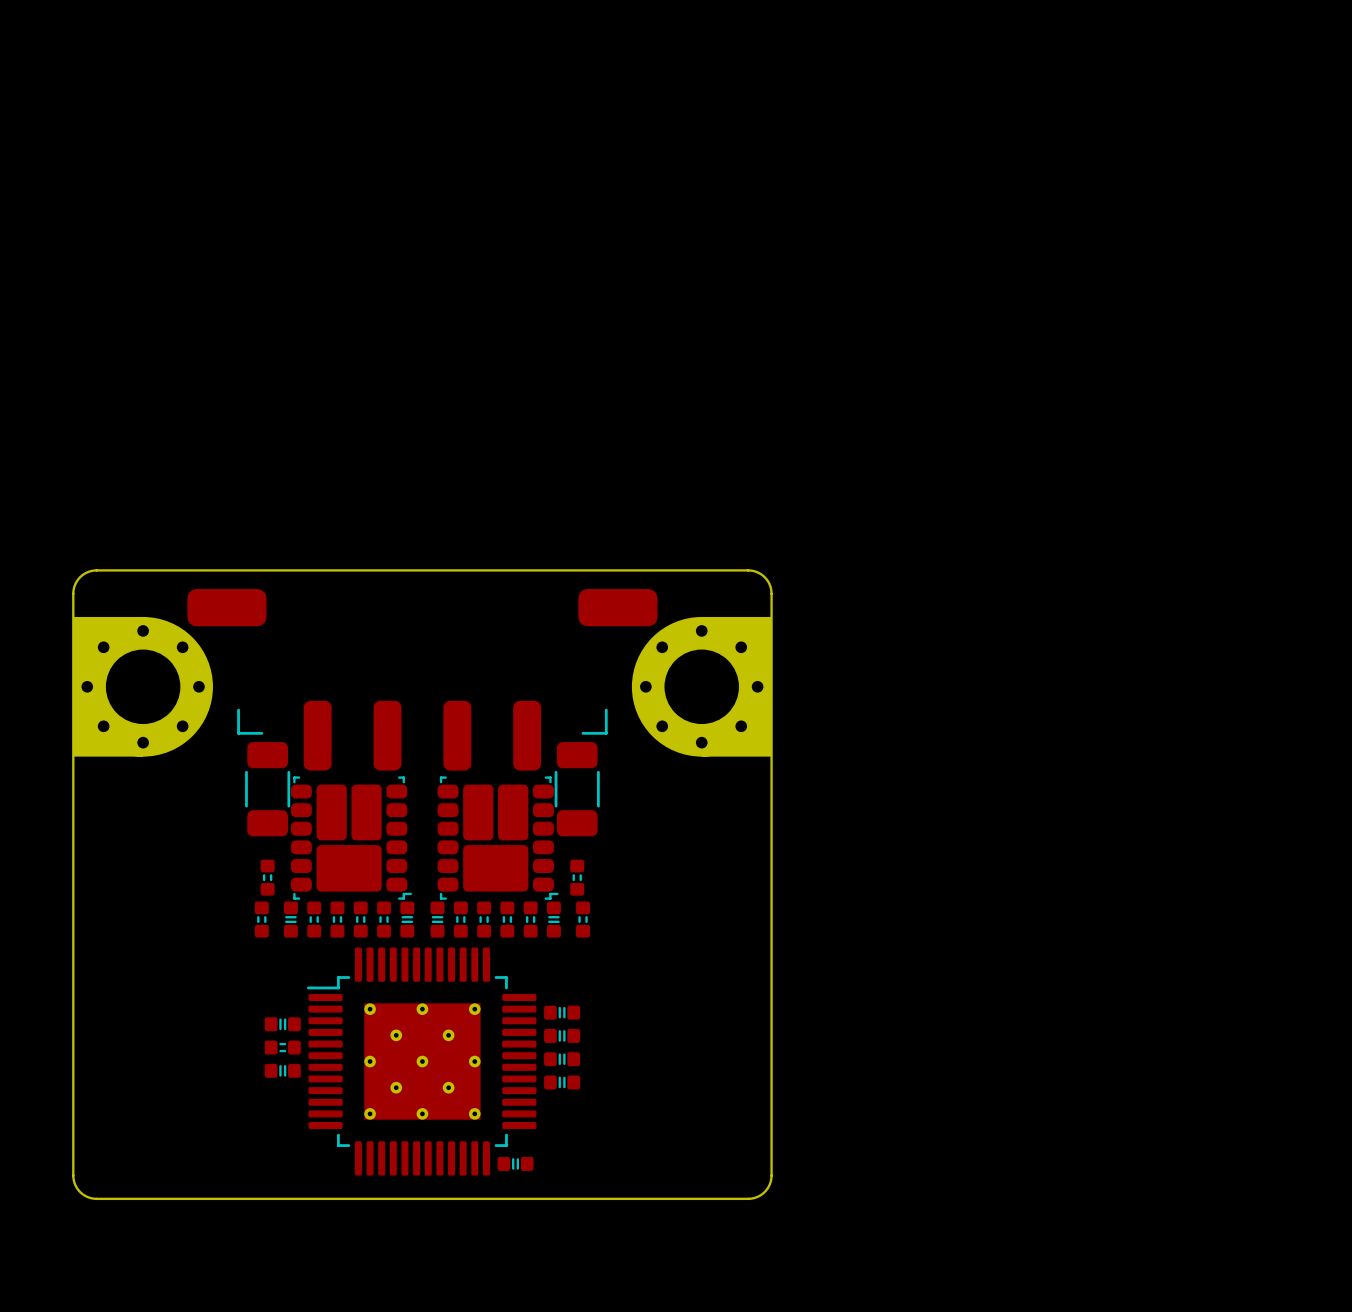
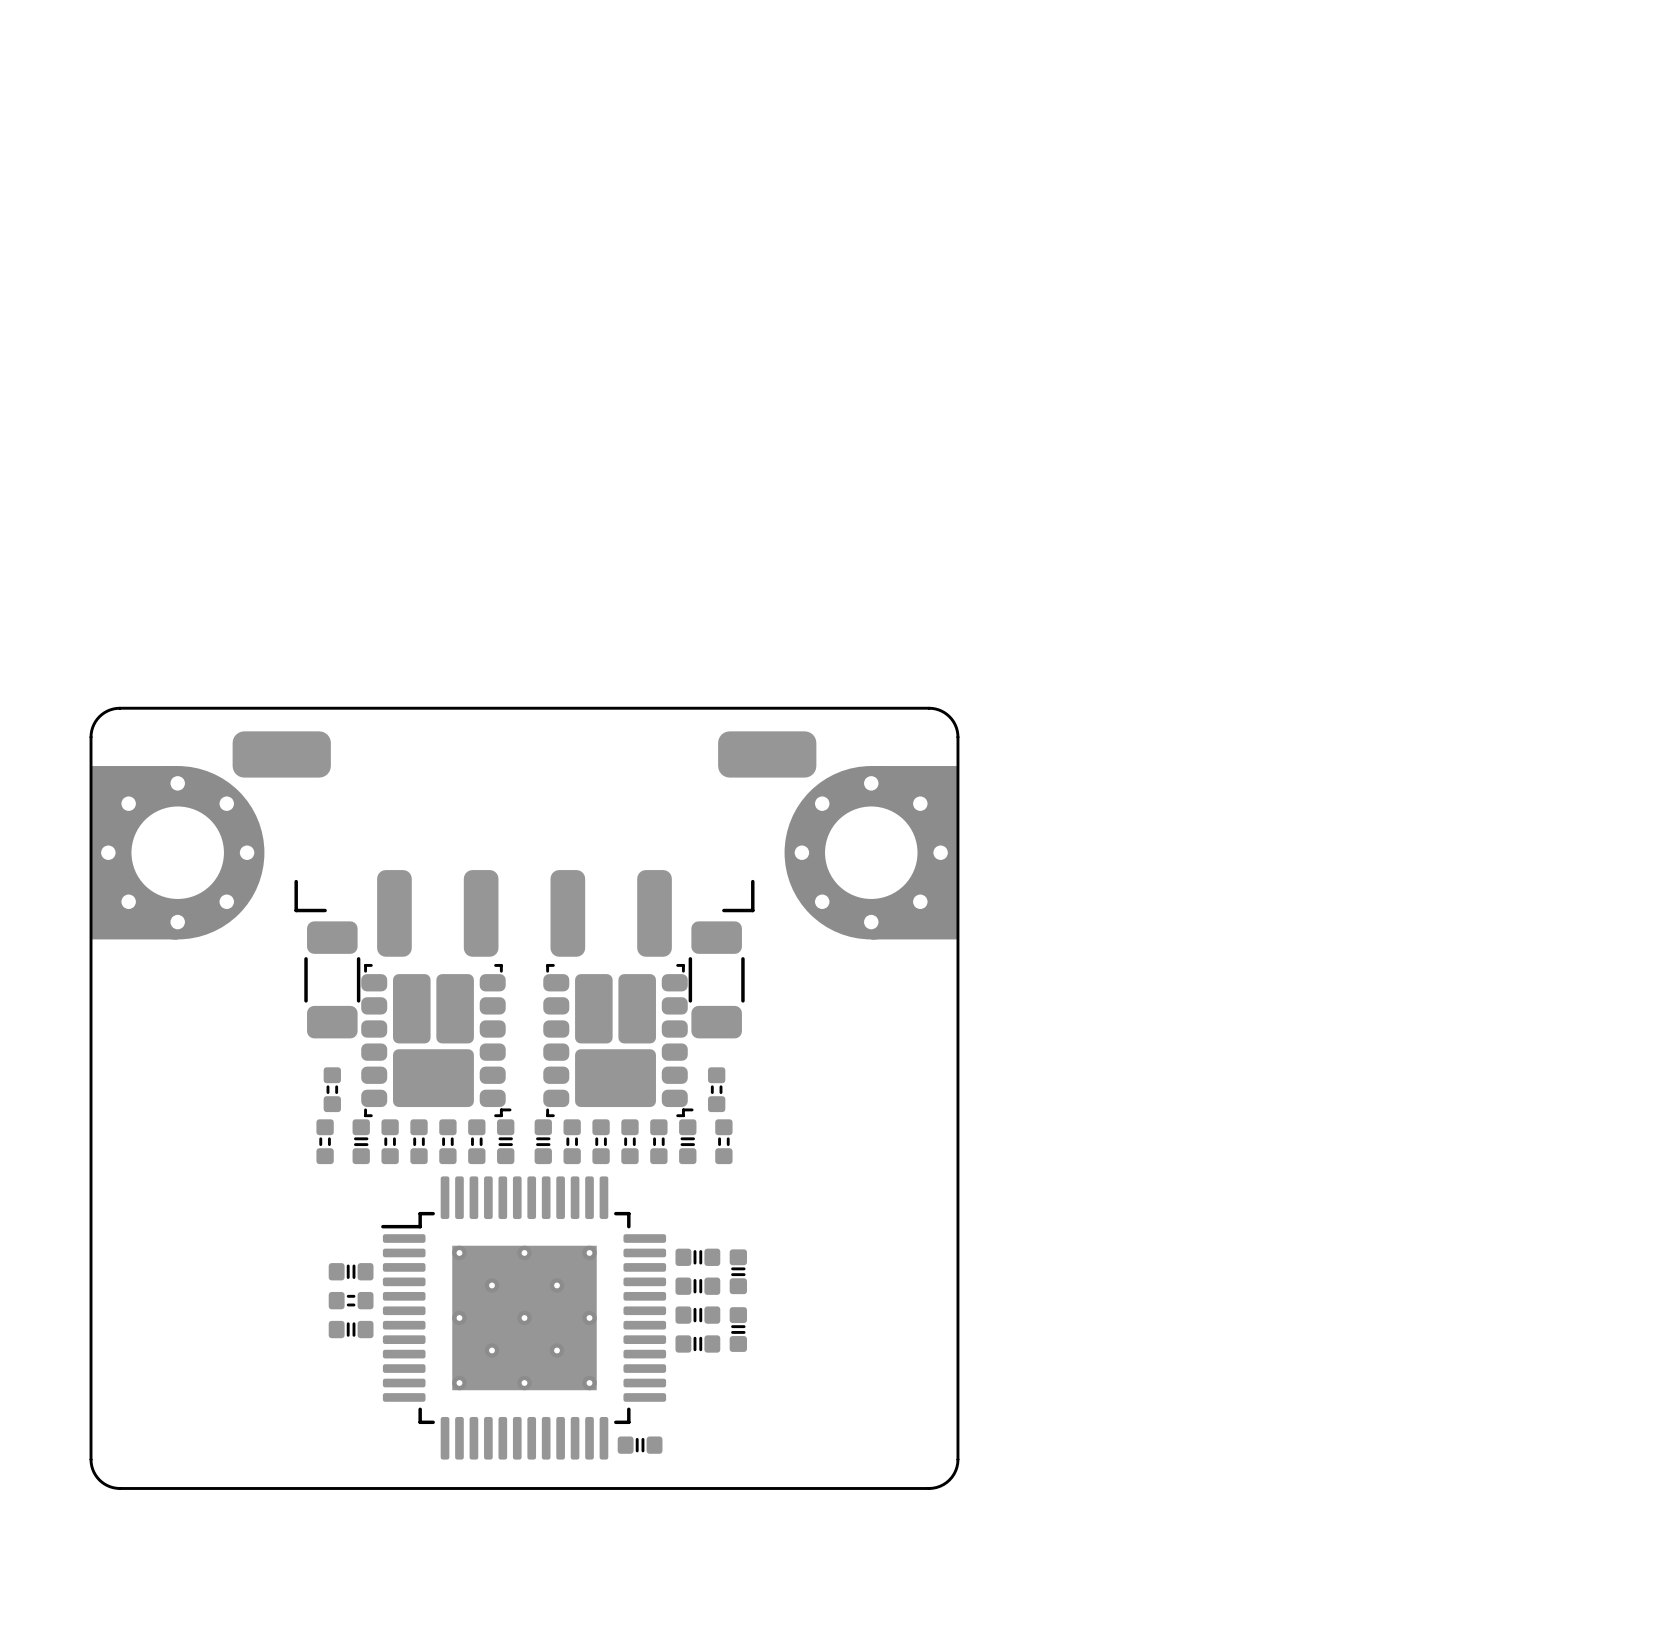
part: none -> (738, 1271)
part: none -> (738, 1329)

